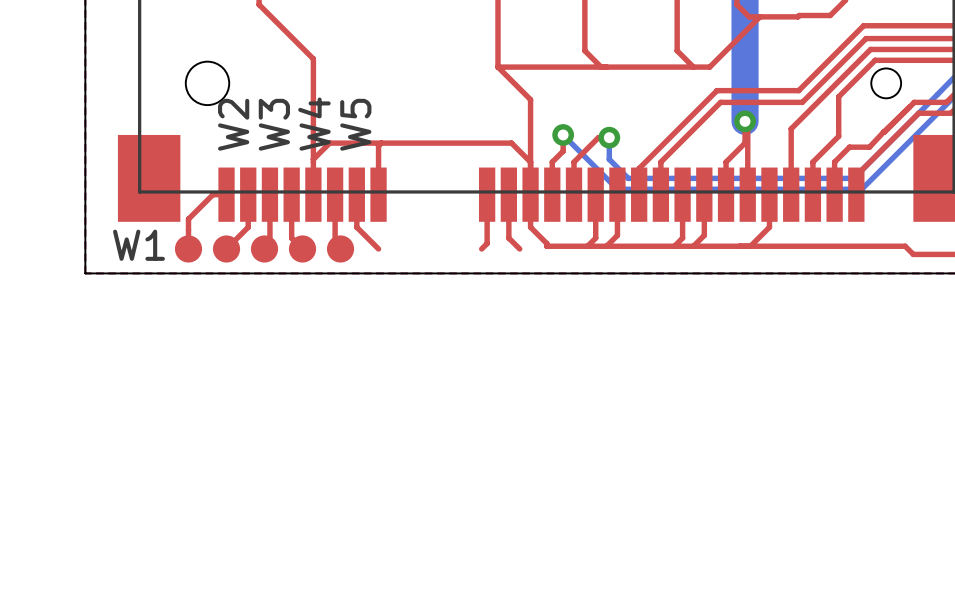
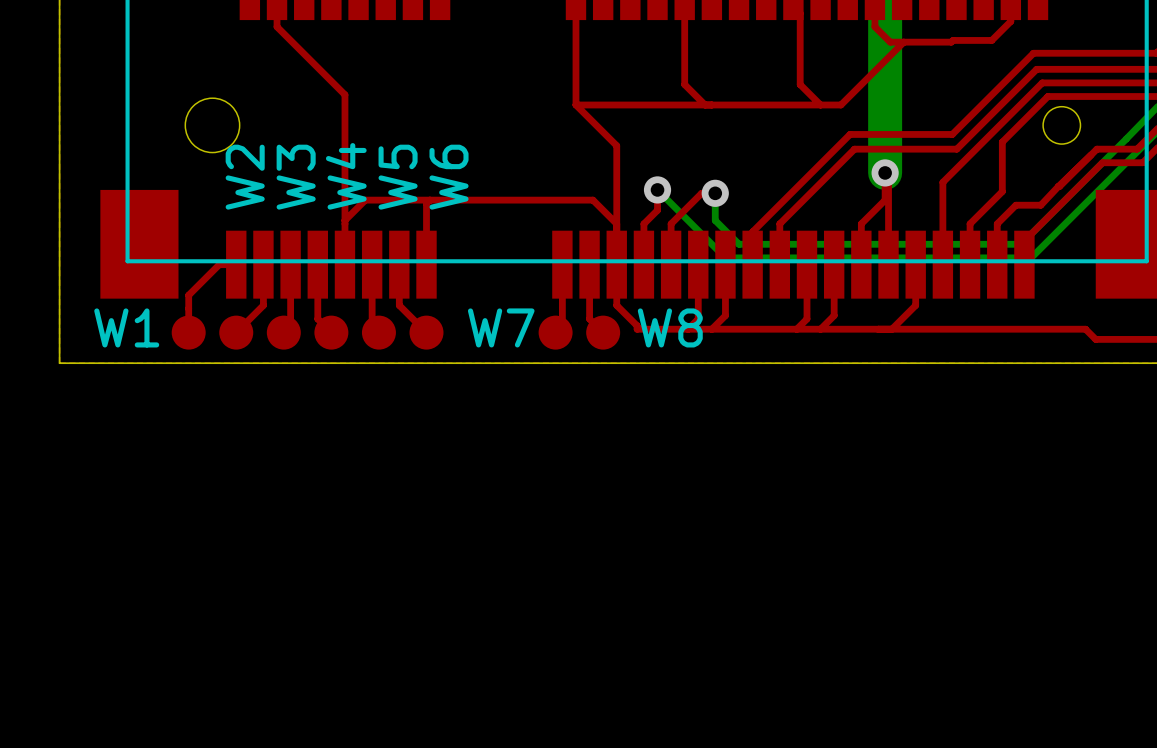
W6: none -> (426, 332)
W7: none -> (555, 332)
W8: none -> (603, 332)

